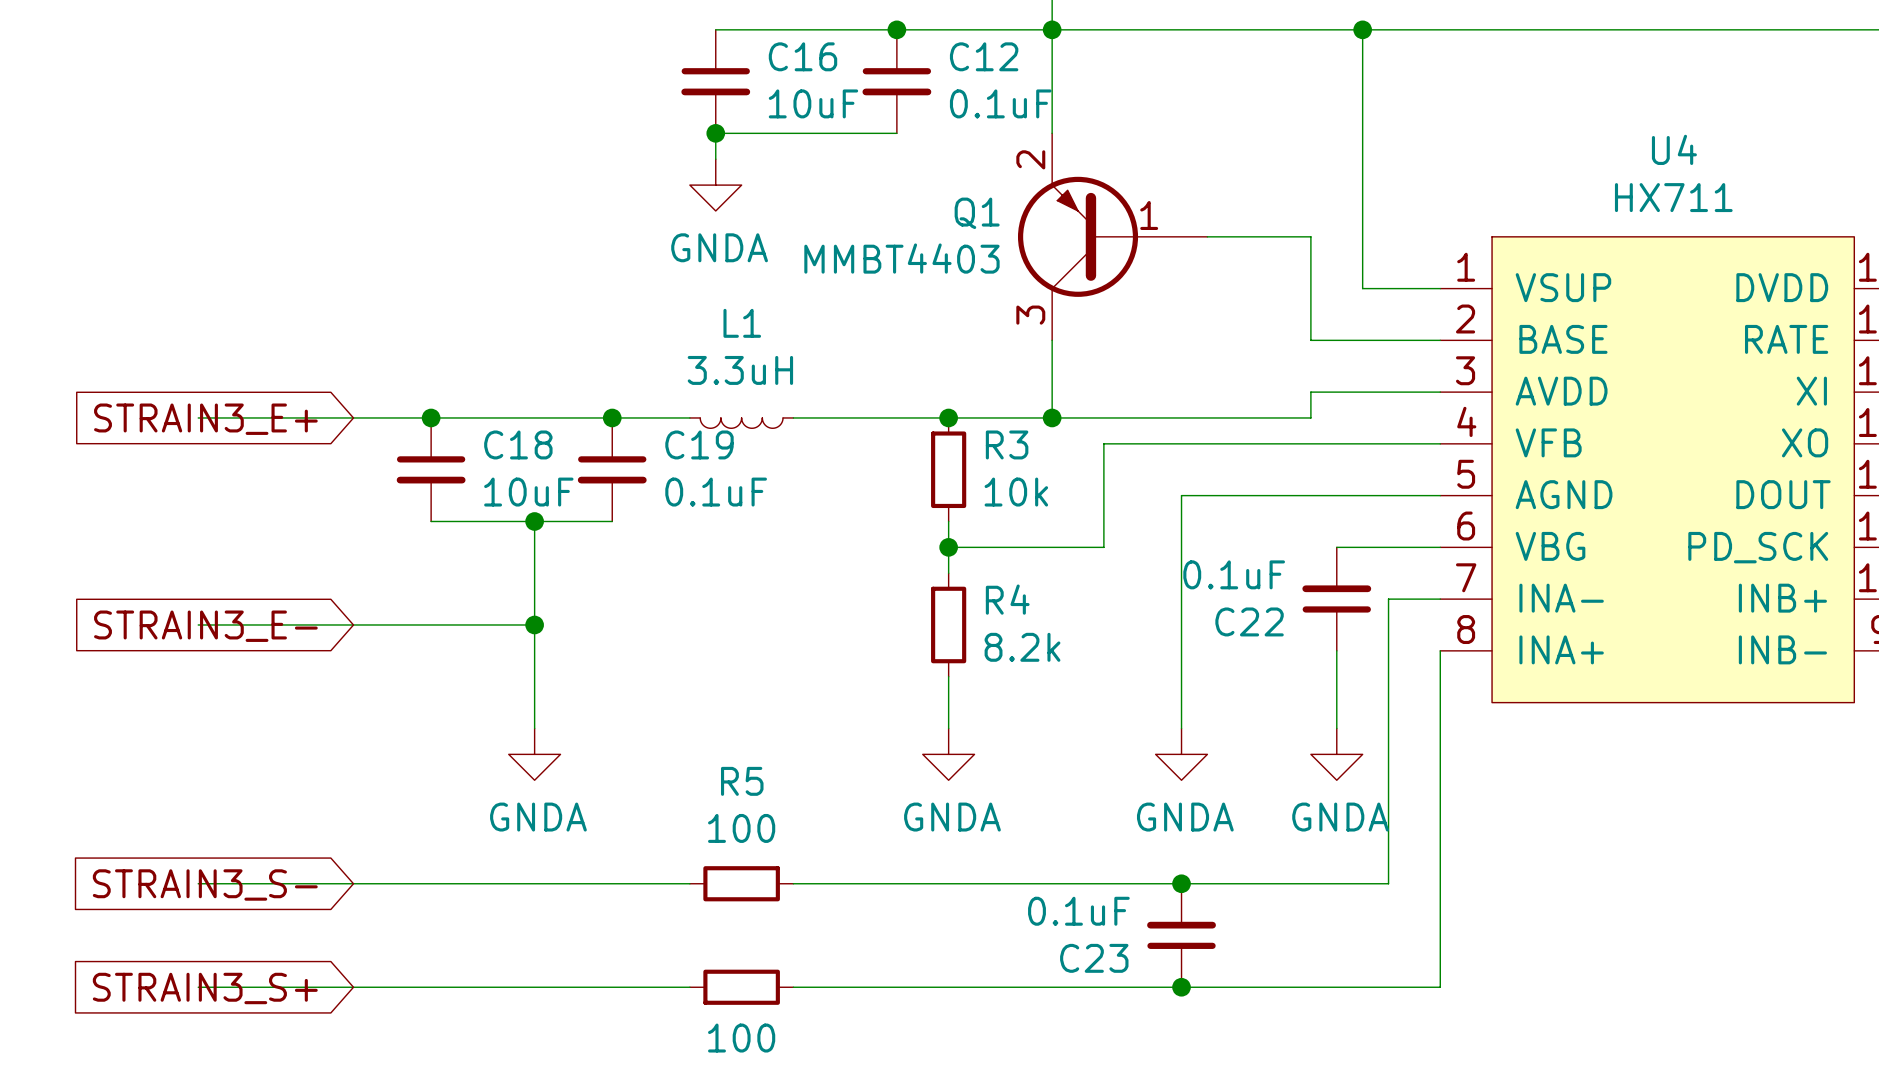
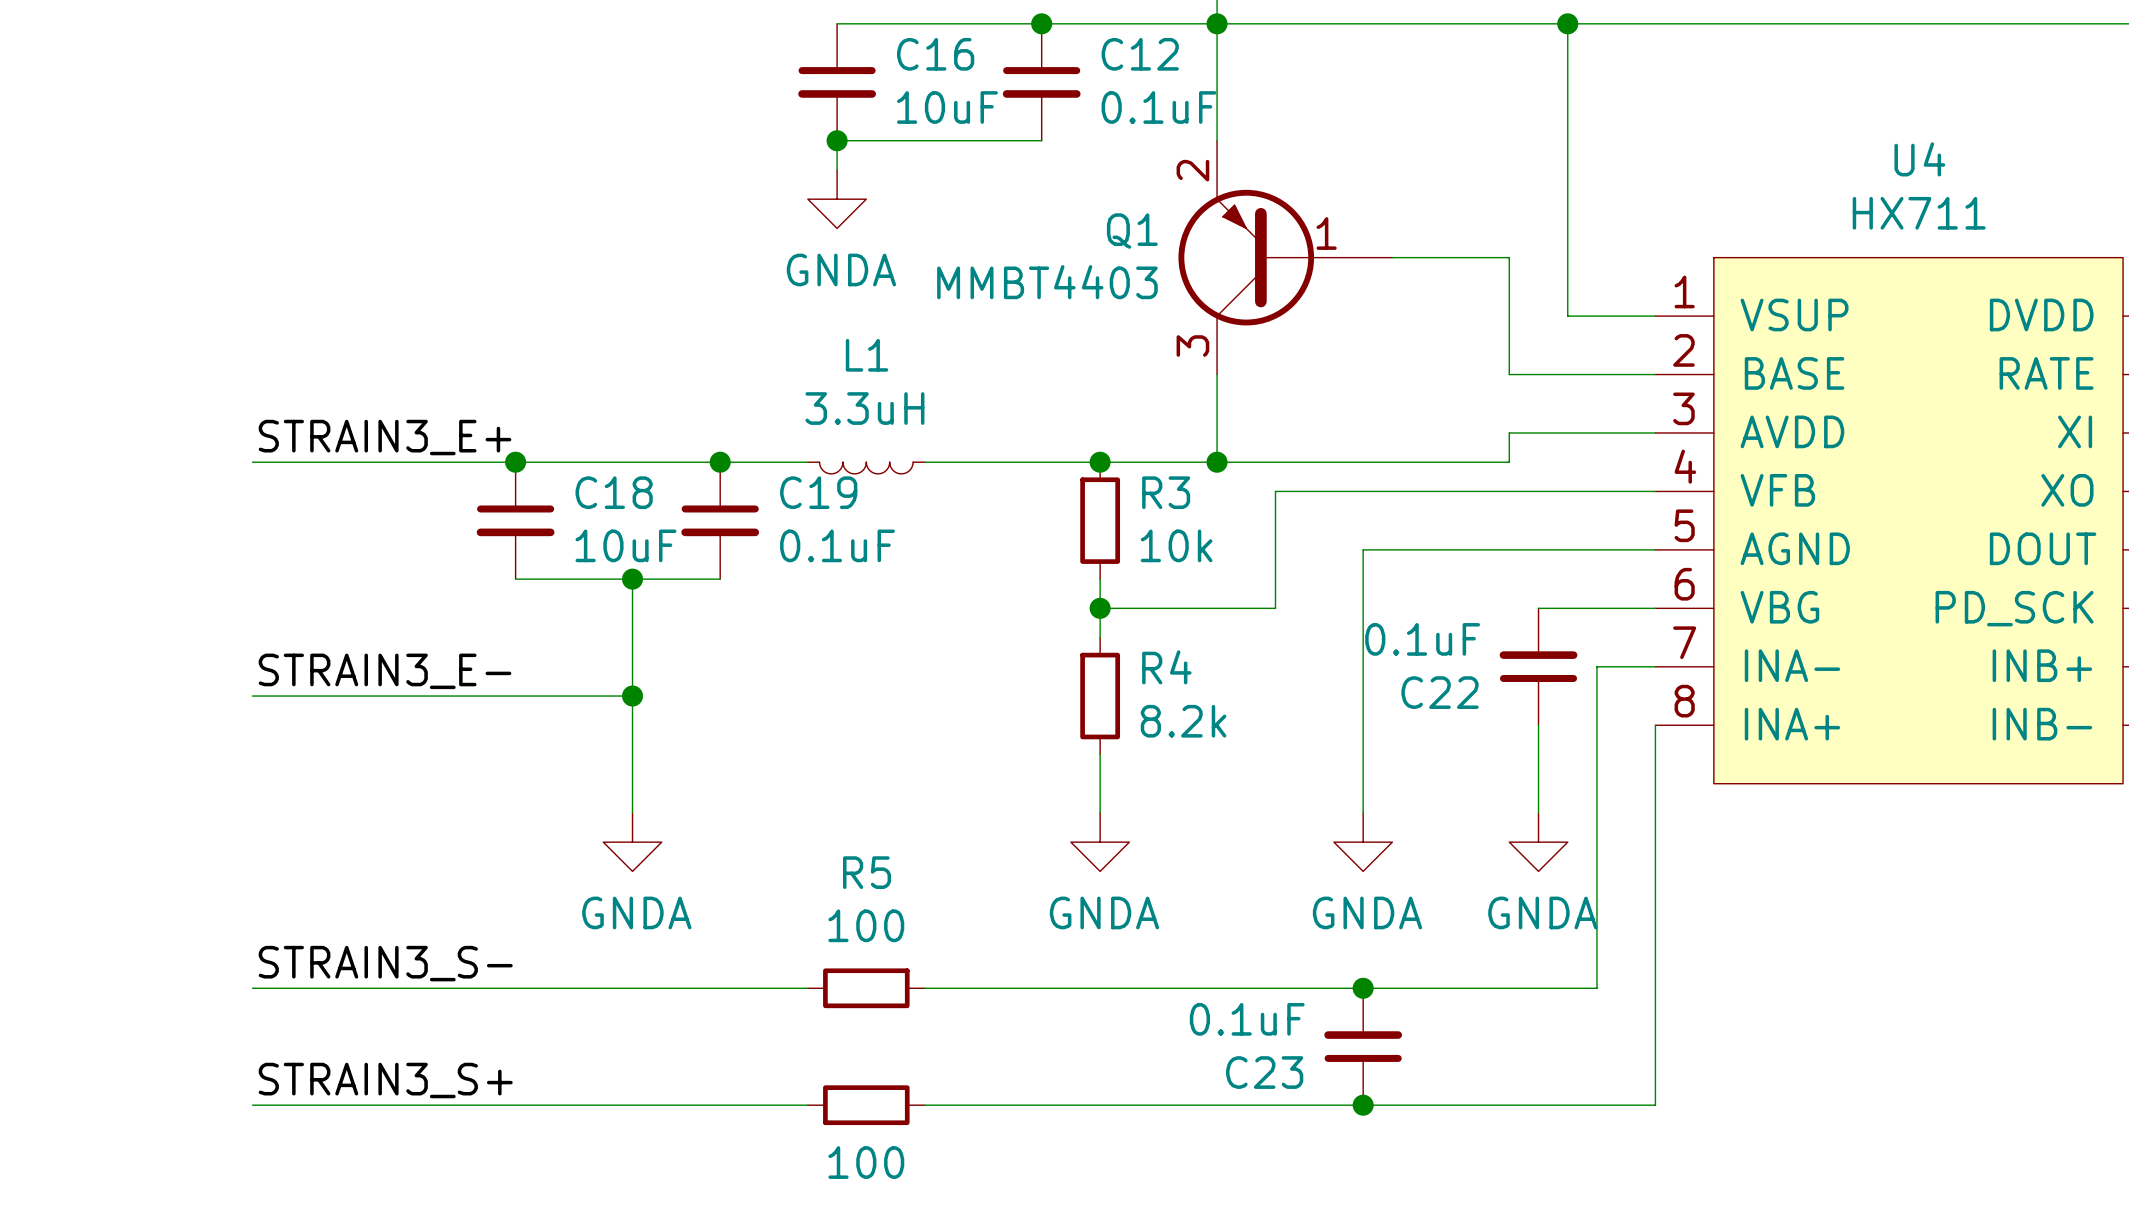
label: none -> STRAIN3_E+ (385, 437)
global label: STRAIN3_E+ (205, 419) -> none
label: none -> STRAIN3_E- (385, 671)
global label: STRAIN3_E- (205, 626) -> none
label: none -> STRAIN3_S- (385, 963)
global label: STRAIN3_S- (205, 884) -> none
label: none -> STRAIN3_S+ (385, 1080)
global label: STRAIN3_S+ (205, 988) -> none

